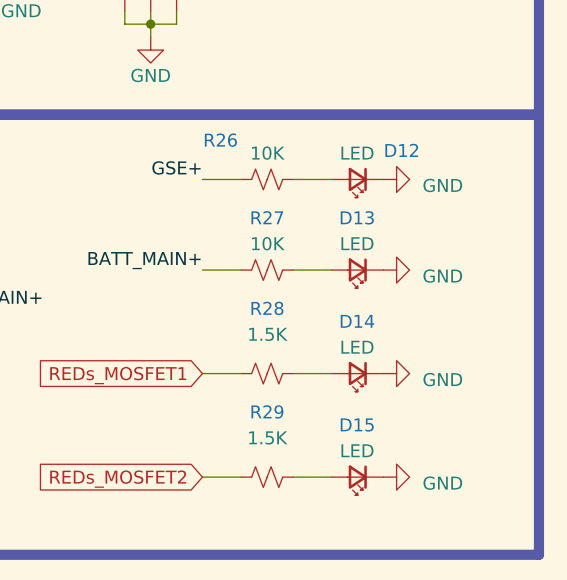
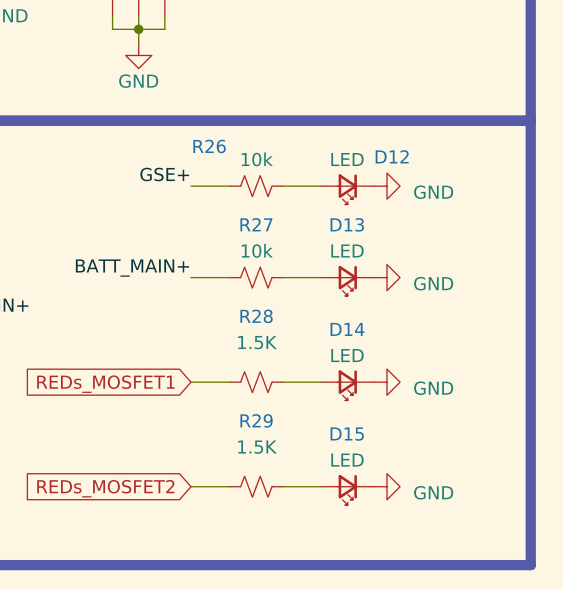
R26 value: 10K (268, 153) -> 10k (257, 159)
R27 value: 10K (268, 243) -> 10k (257, 250)

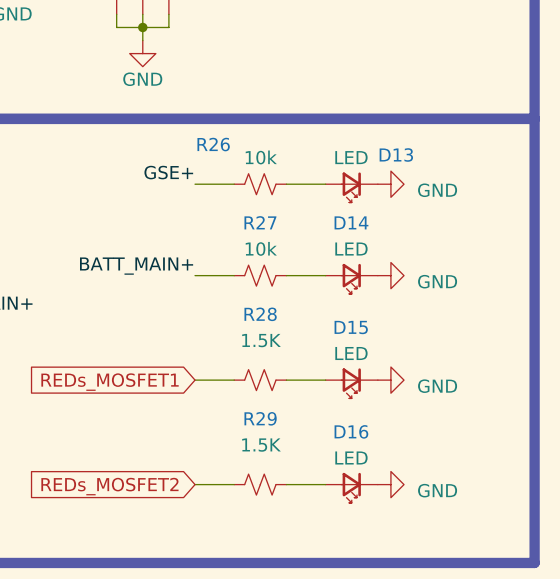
D12 name: D12 (392, 156) -> D13 (396, 154)
D13 name: D13 (347, 224) -> D14 (351, 222)
D14 name: D14 (347, 329) -> D15 (351, 327)
D15 name: D15 (347, 434) -> D16 (351, 431)

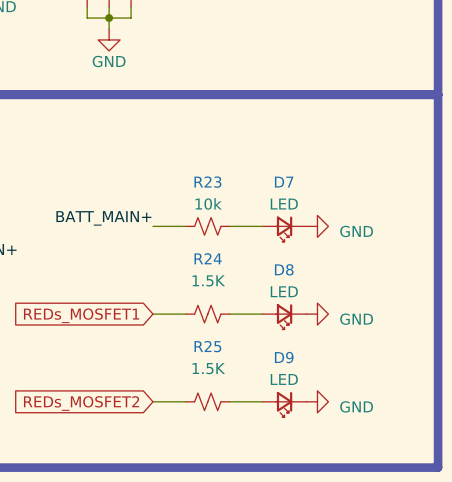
label: GSE+ (168, 172) -> none
wire: (195, 184) (234, 184) -> none
R26: 10k (260, 184) -> none
wire: (286, 184) (325, 184) -> none
power symbol: GND (390, 184) -> none
D13: LED (351, 187) -> none
R27 name: R27 (260, 222) -> R23 (207, 182)
D14 name: D14 (351, 222) -> D7 (284, 182)
R28 name: R28 (260, 314) -> R24 (208, 258)
D15 name: D15 (351, 327) -> D8 (284, 269)
R29 name: R29 (260, 418) -> R25 (207, 346)
D16 name: D16 (351, 431) -> D9 (284, 357)

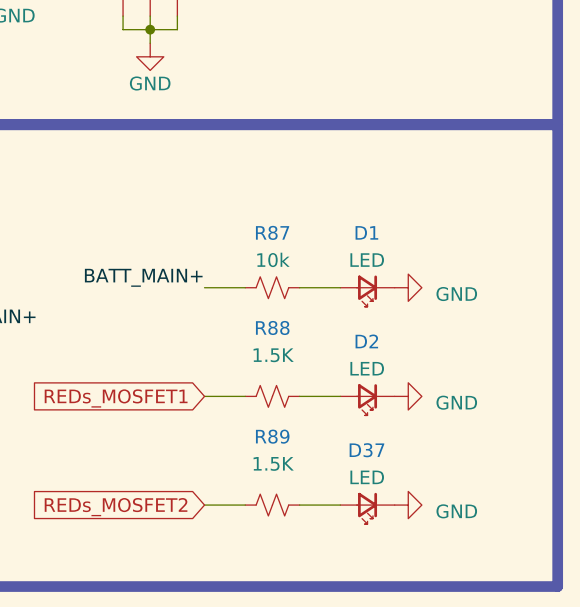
R23 name: R23 (207, 182) -> R87 (272, 232)
D7 name: D7 (284, 182) -> D1 (366, 232)
R24 name: R24 (208, 258) -> R88 (272, 327)
D8 name: D8 (284, 269) -> D2 (366, 341)
R25 name: R25 (207, 346) -> R89 (272, 436)
D9 name: D9 (284, 357) -> D37 (366, 450)

